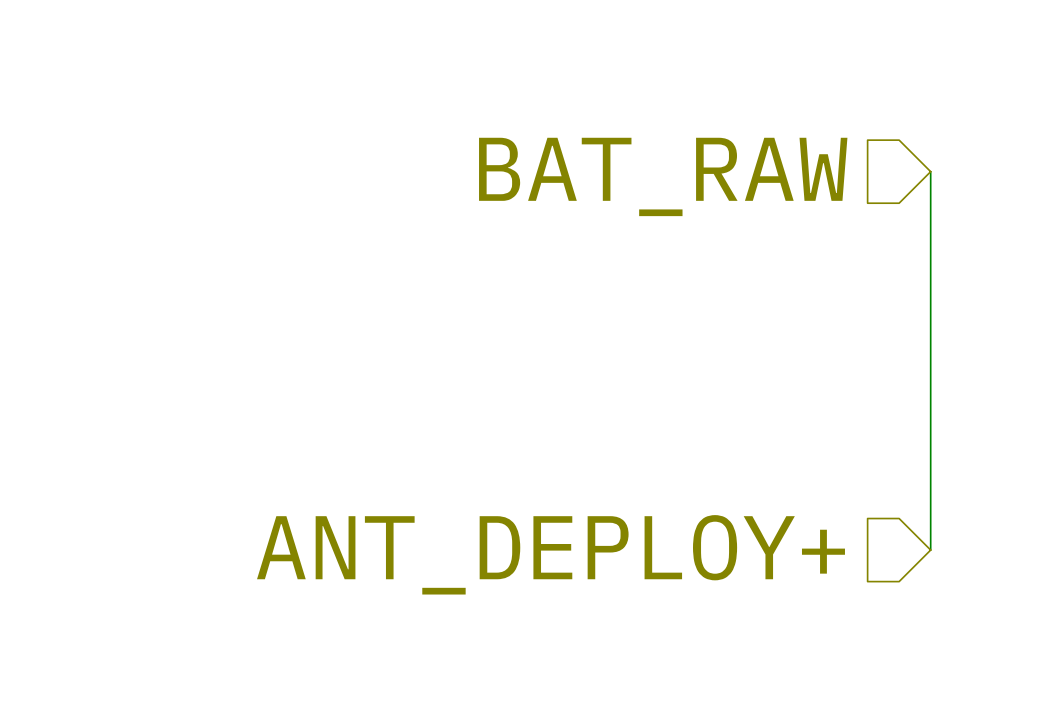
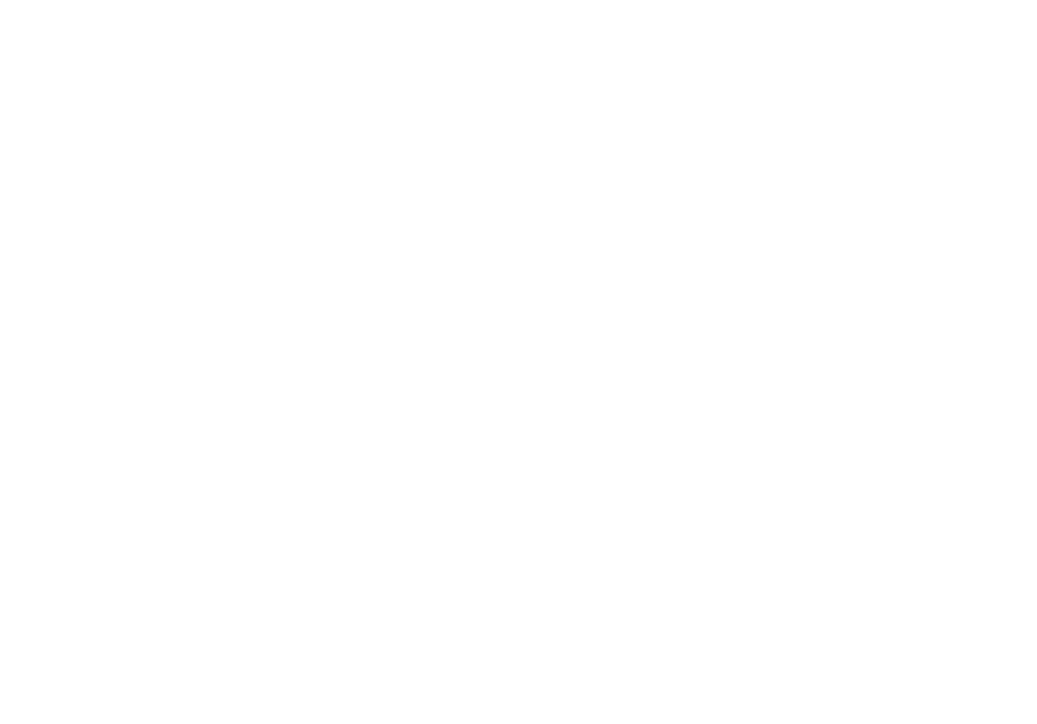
wire: (930, 171) (930, 550) -> none
hierarchical label: BAT_RAW (663, 176) -> none
hierarchical label: ANT_DEPLOY+ (551, 554) -> none

